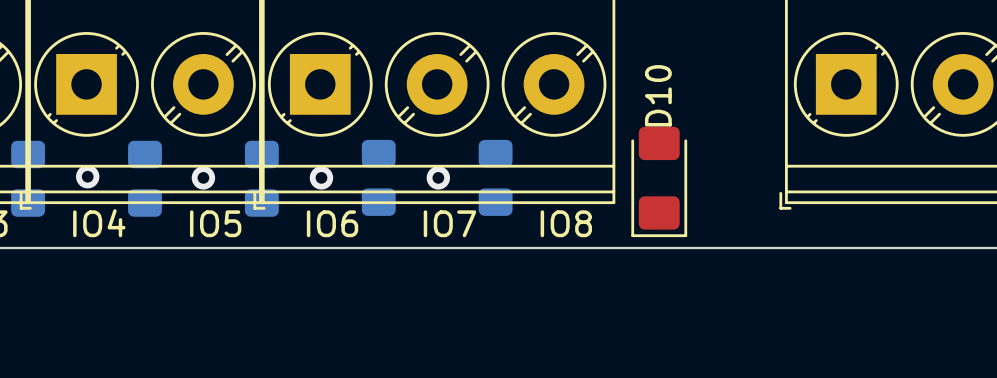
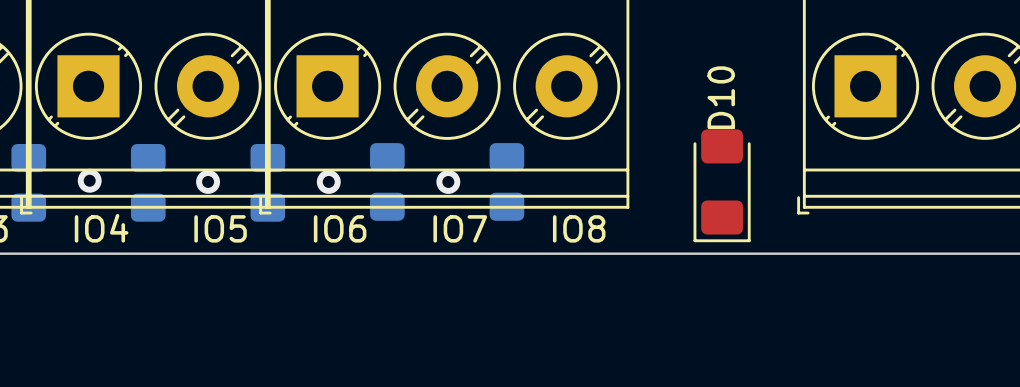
D10 position: (659, 181) -> (722, 185)

